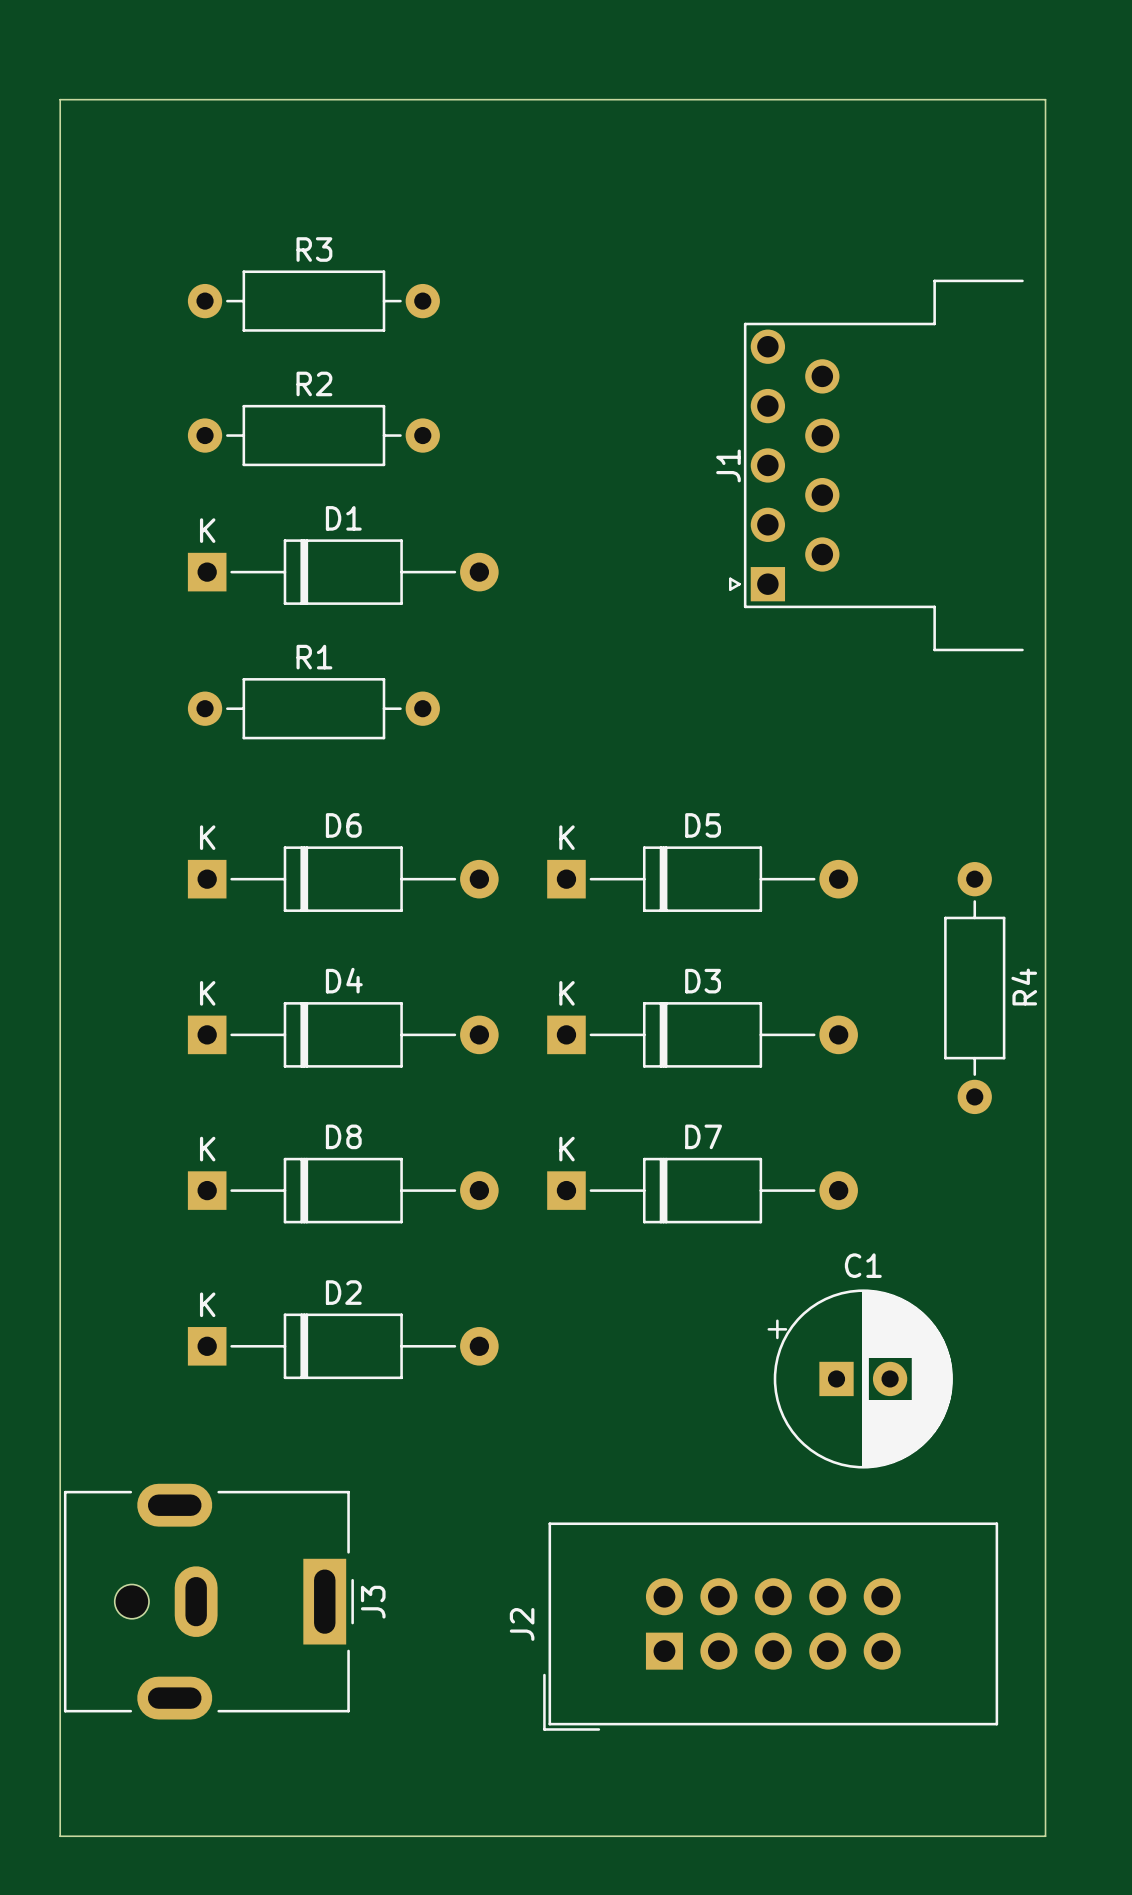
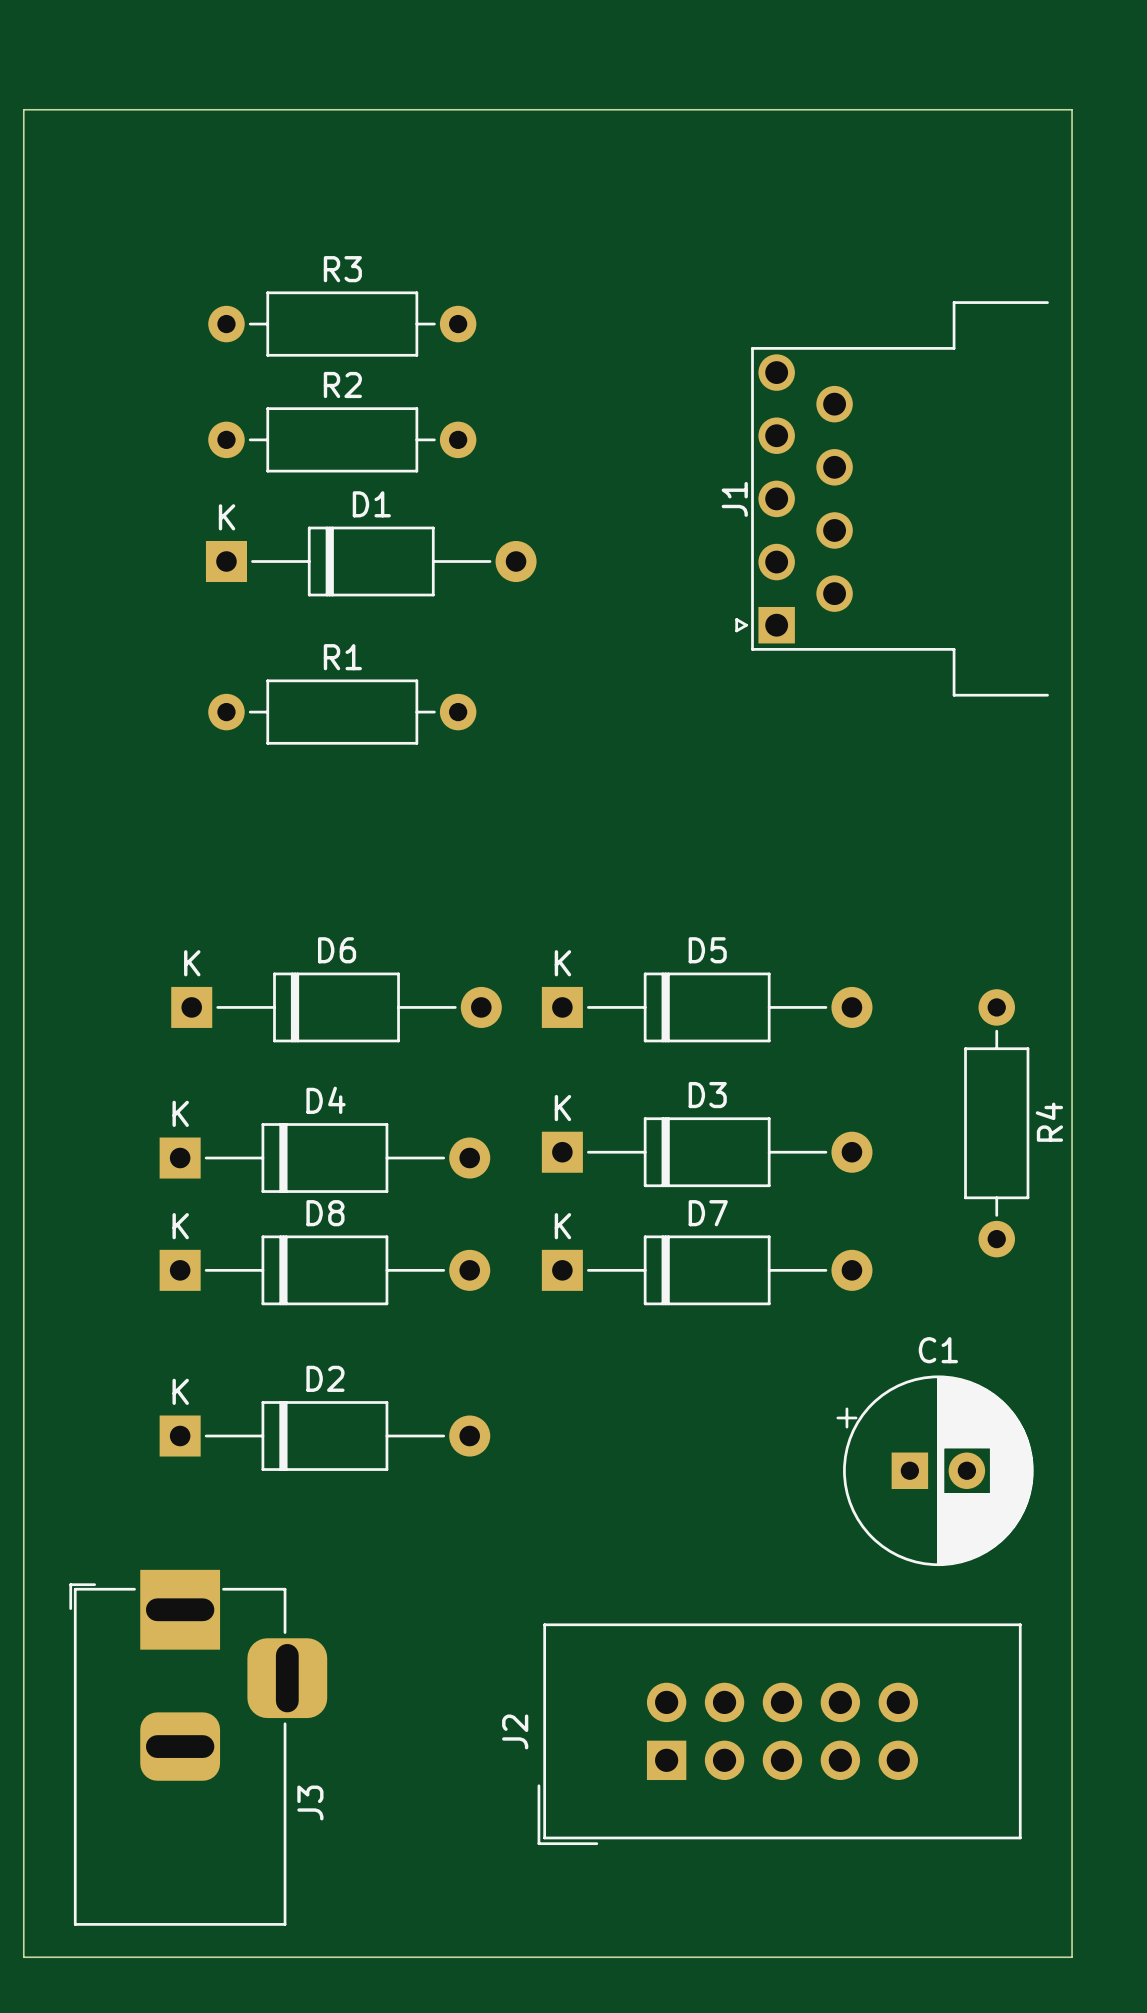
R3 position: (313, 301) -> (342, 324)
R2 position: (313, 435) -> (342, 439)
D1 position: (343, 572) -> (371, 561)
R1 position: (313, 708) -> (342, 712)
D6 position: (343, 879) -> (336, 1007)
D5 position: (702, 879) -> (707, 1007)
R4 position: (974, 988) -> (996, 1123)
D4 position: (343, 1034) -> (324, 1158)
D3 position: (702, 1034) -> (707, 1152)
C1 position: (860, 1378) -> (935, 1470)
J3 footprint: [63, 1483, 354, 1720] -> [69, 1569, 328, 1926]
J3 name position: J3 (373, 1602) -> J3 (310, 1802)

